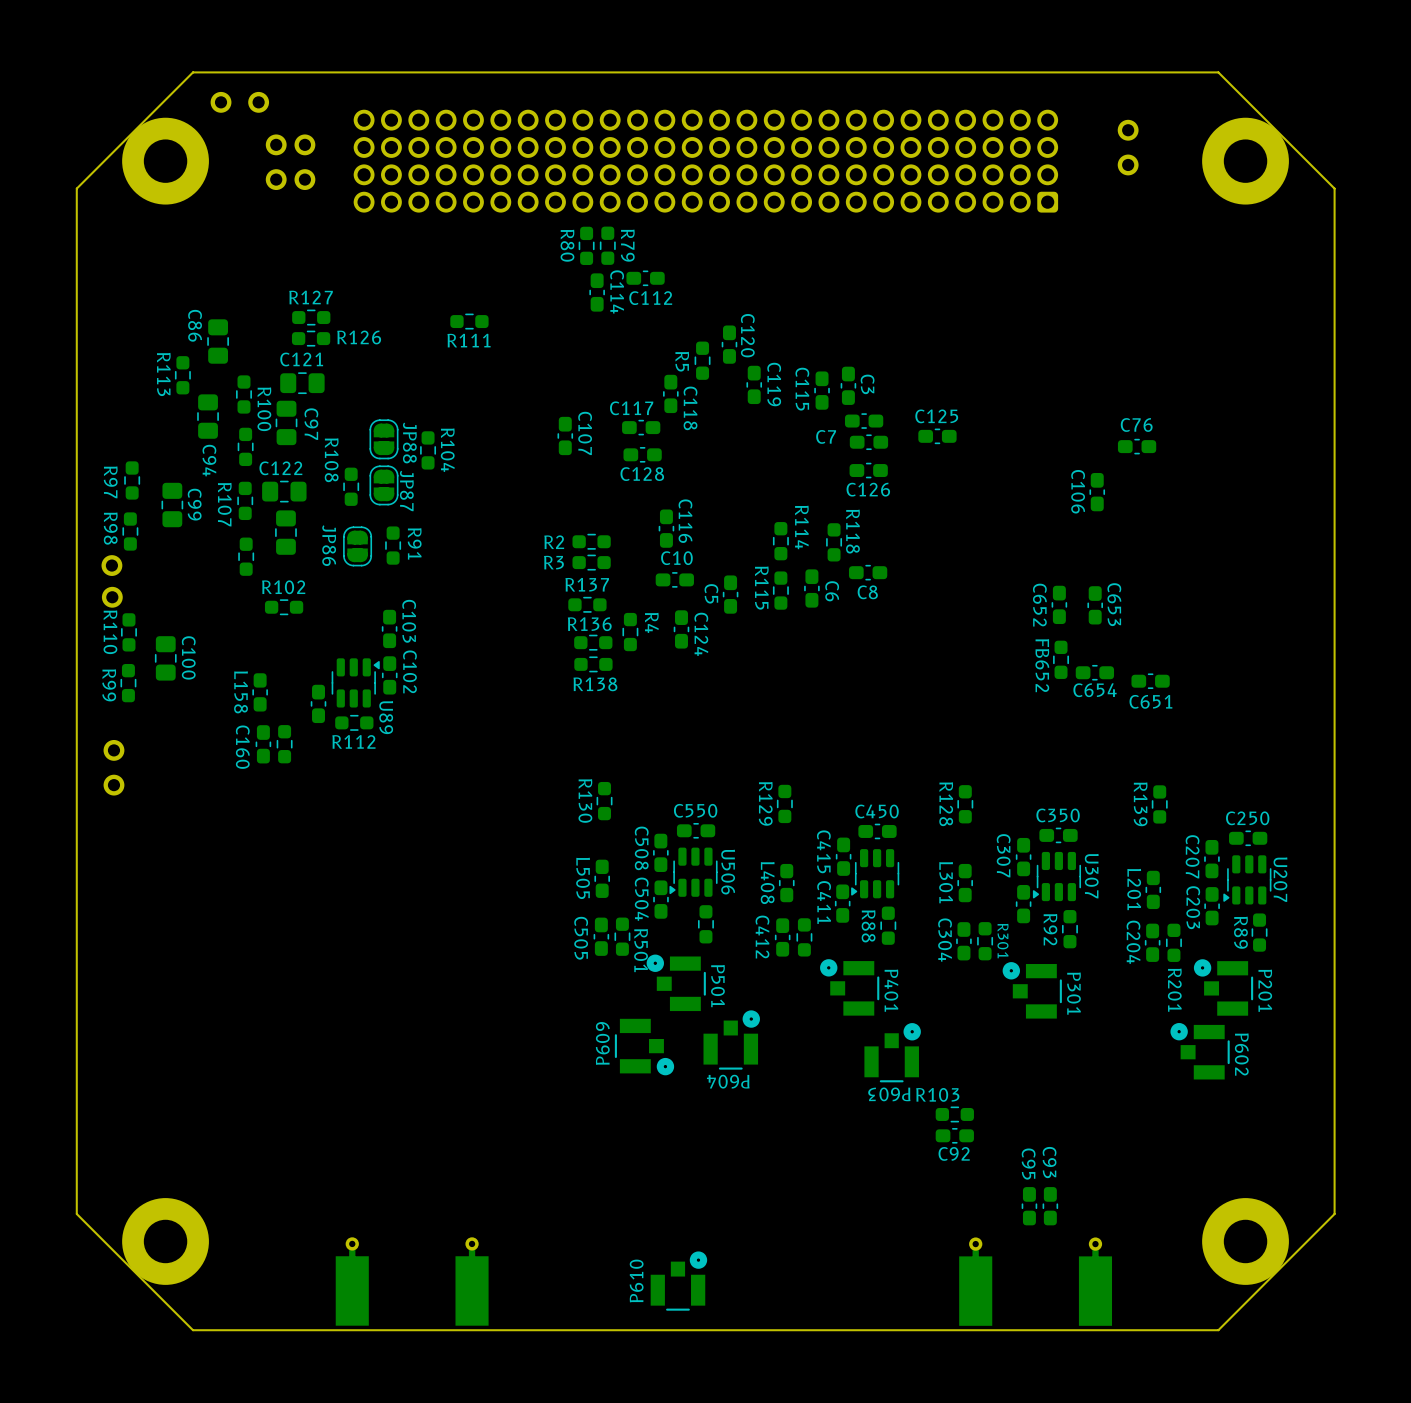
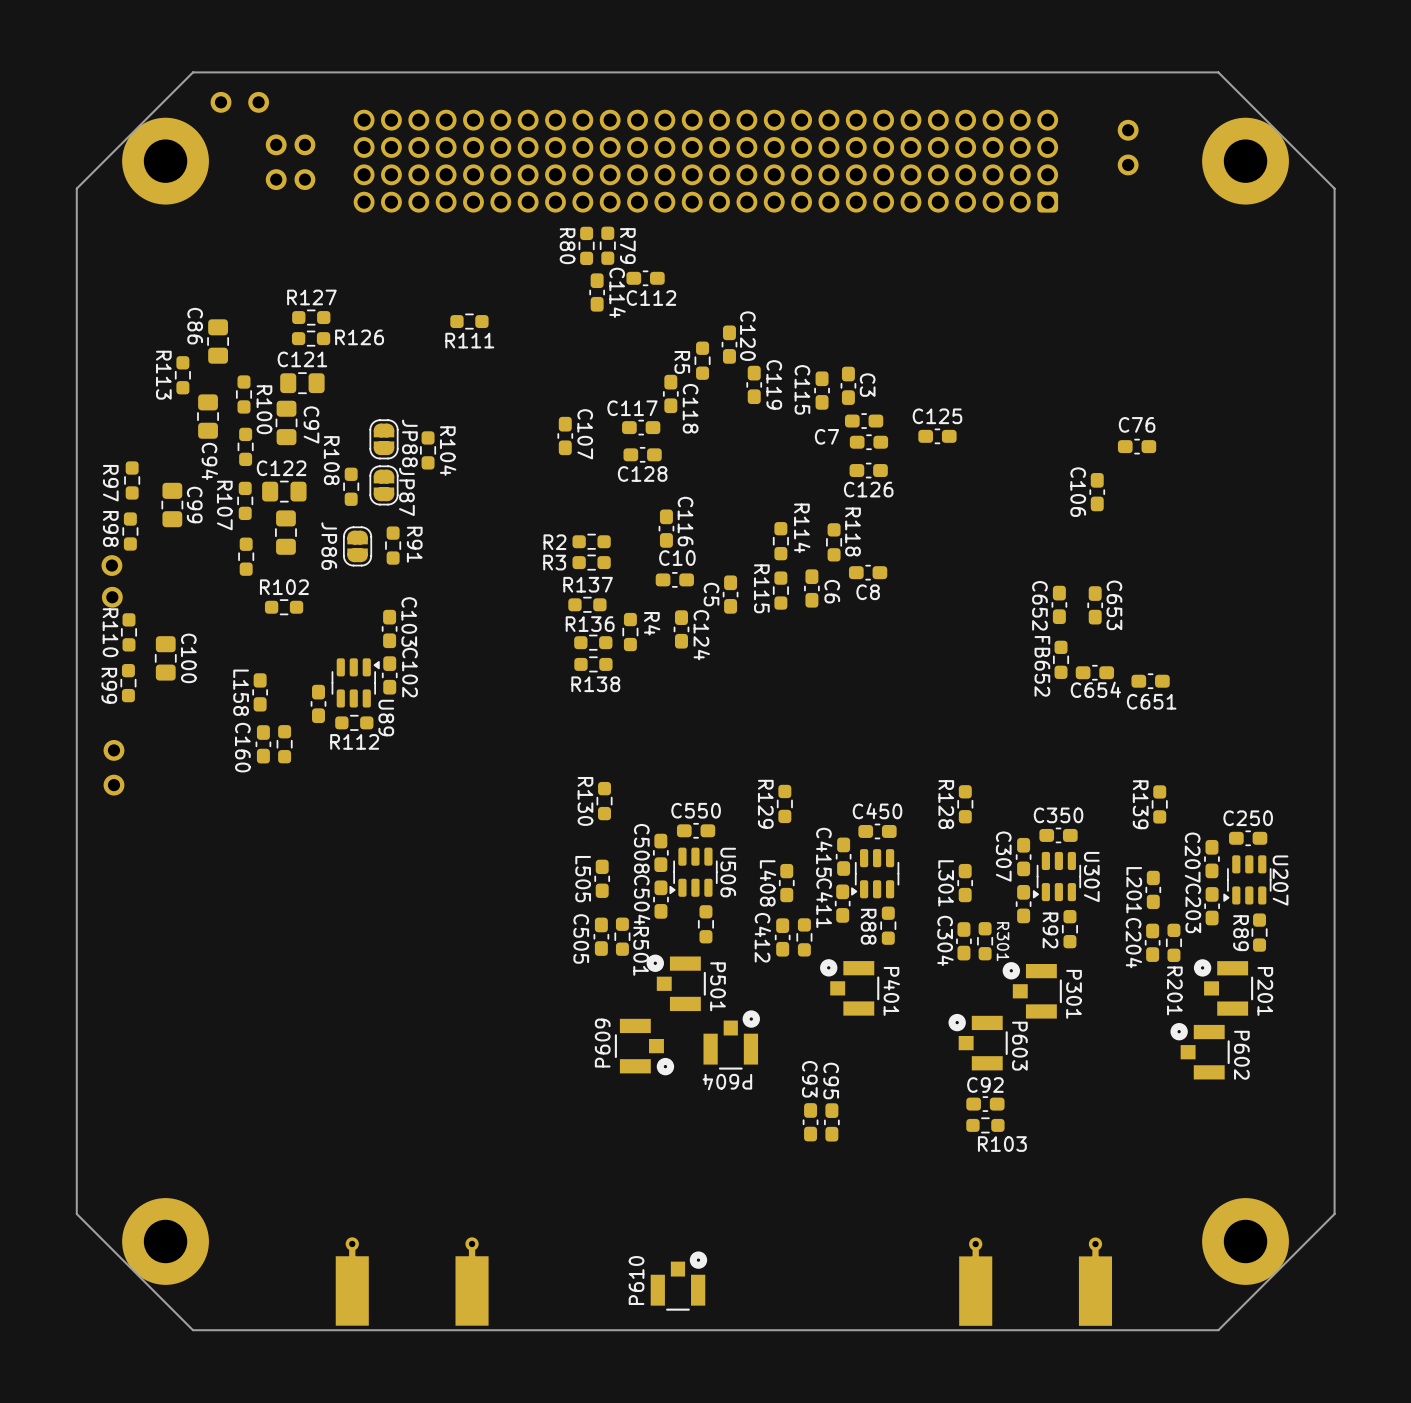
P603 rotation: 0° (892, 1052) -> 90° counterclockwise (978, 1042)
P603 position: (892, 1052) -> (978, 1042)
R103 name position: R103 (937, 1094) -> R103 (1002, 1144)
R103 position: (954, 1114) -> (985, 1125)
C92 position: (954, 1135) -> (985, 1104)
C92 name position: C92 (954, 1153) -> C92 (985, 1085)
C95 position: (1029, 1206) -> (831, 1122)
C93 position: (1050, 1206) -> (810, 1122)

